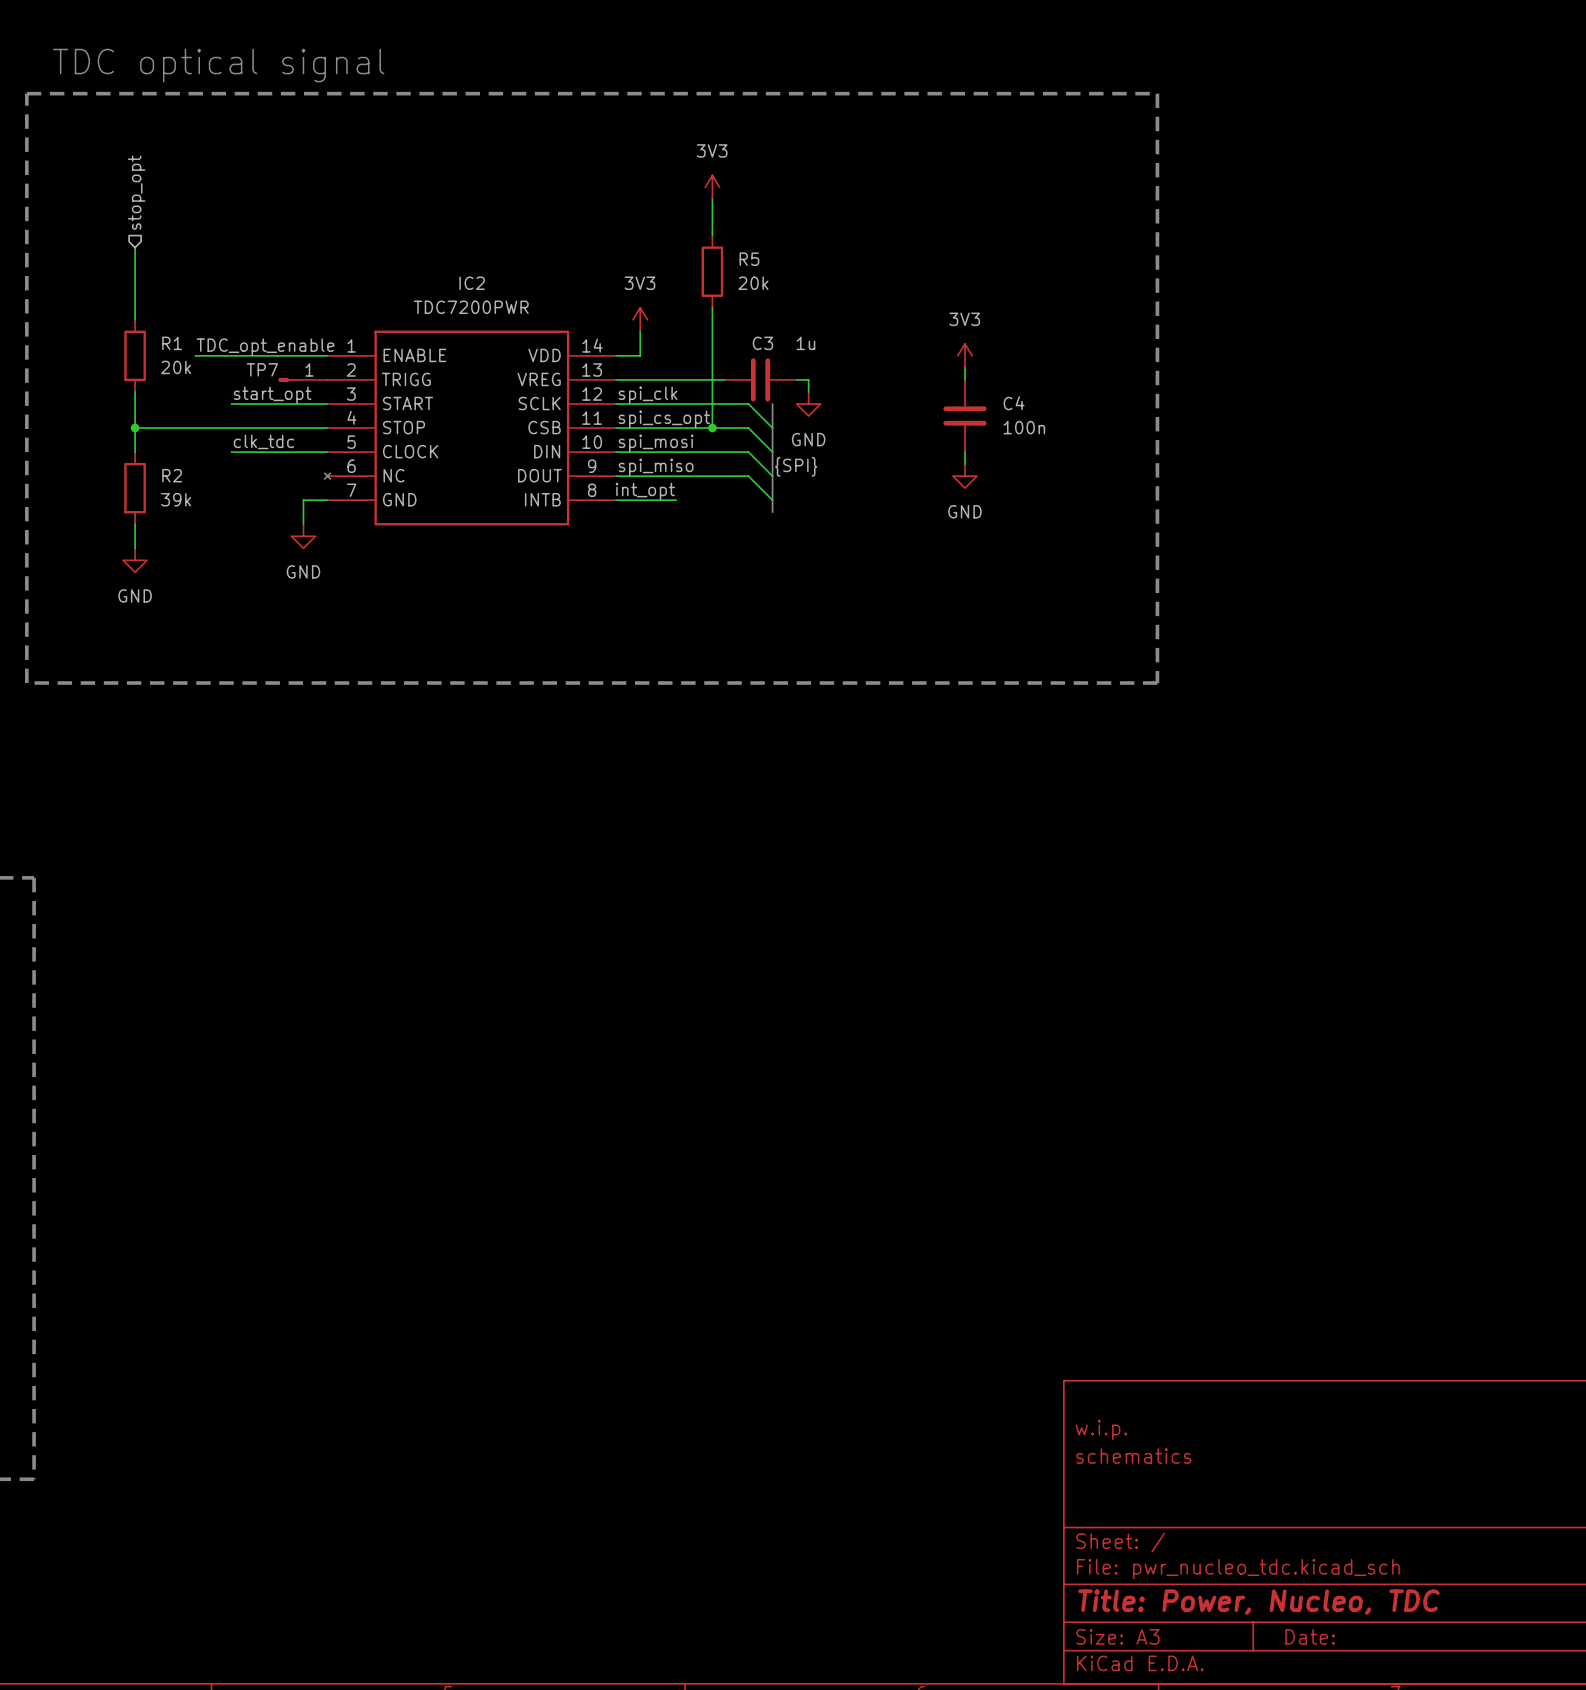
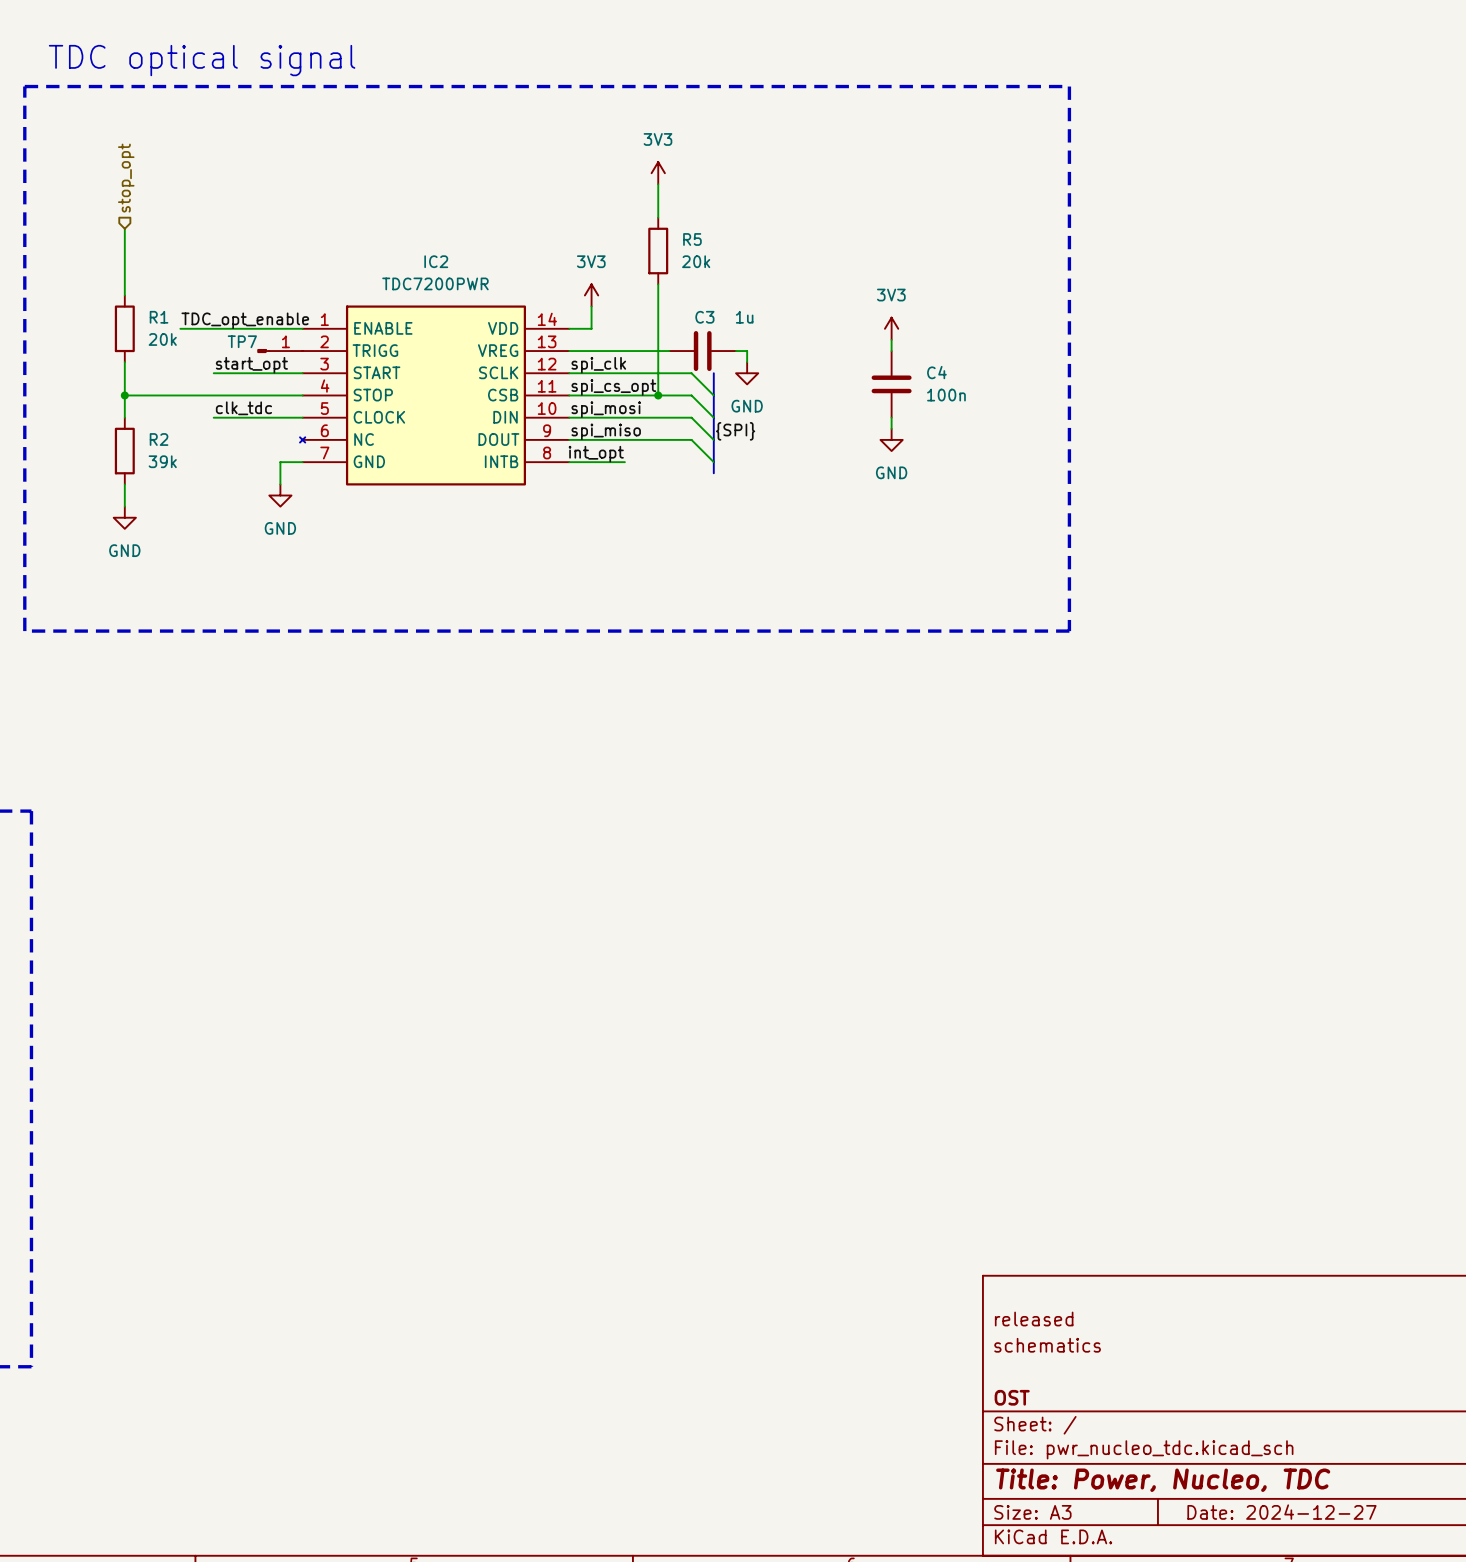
title block: w.i.p. (1101, 1429) -> released (1034, 1319)
title block: none -> OST (1012, 1397)
title block: Date: (1310, 1636) -> Date: 2024-12-27 (1281, 1512)

